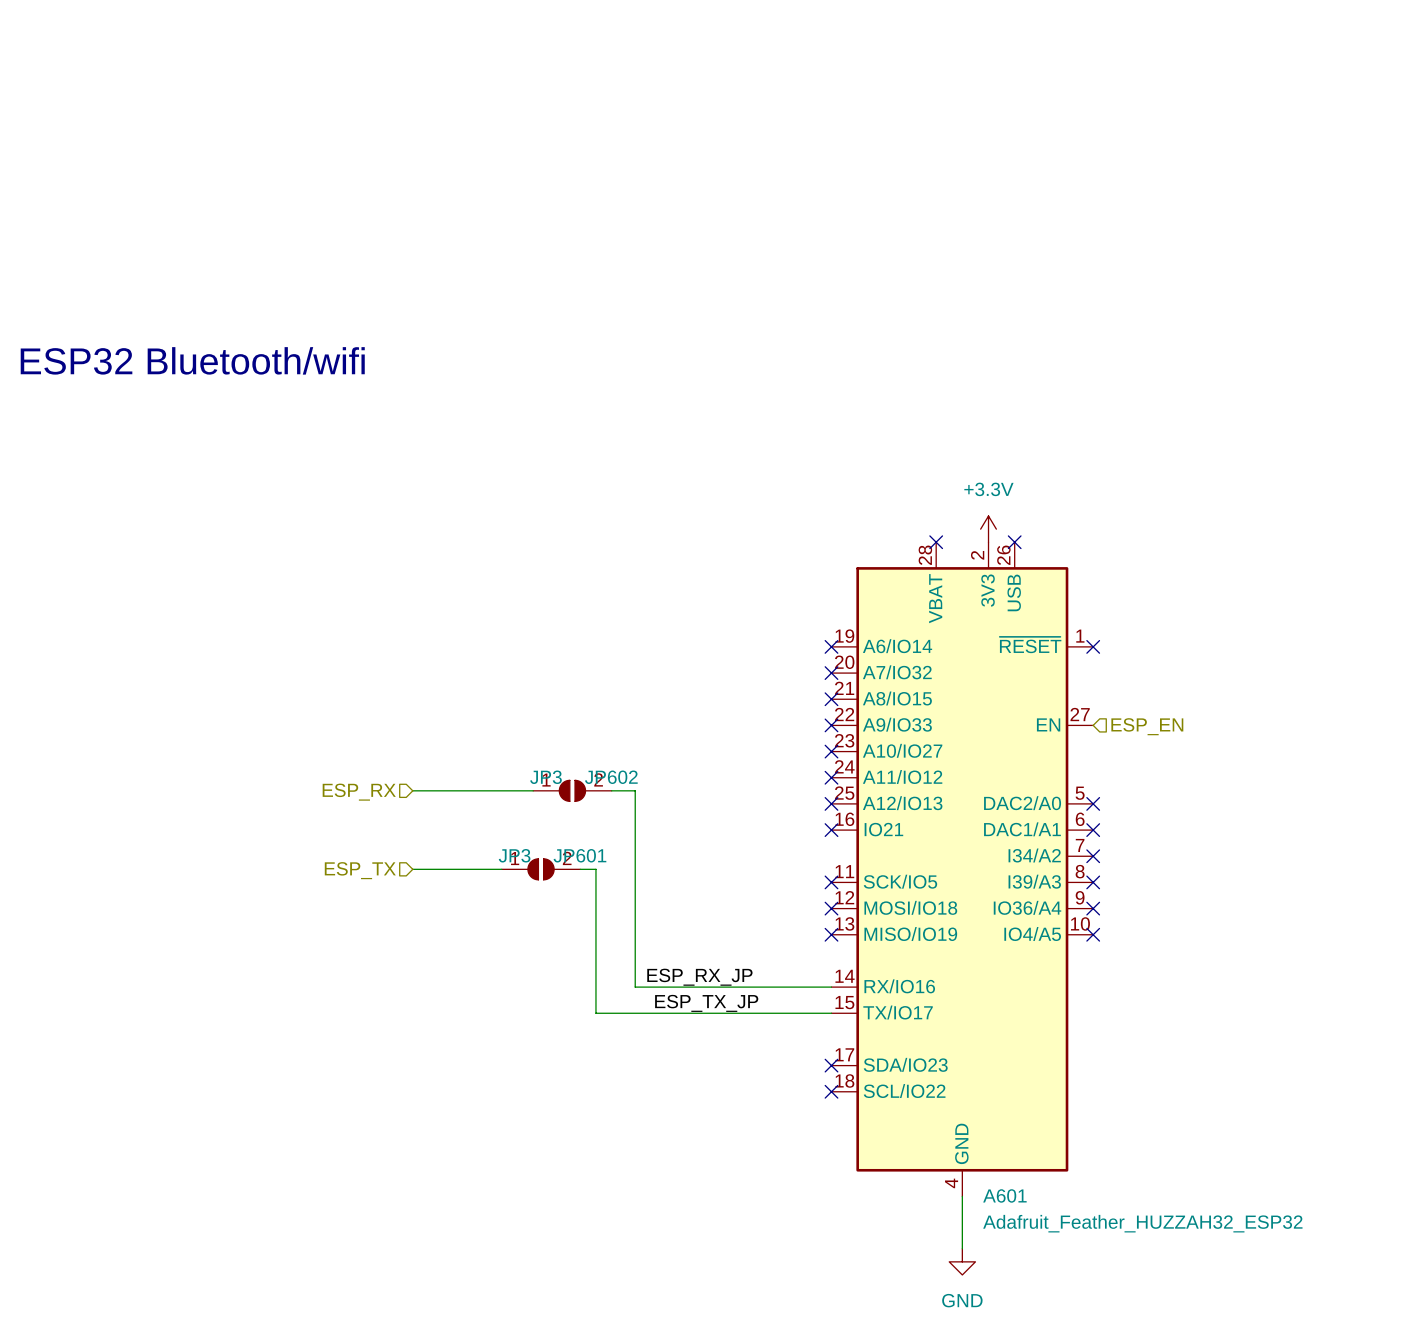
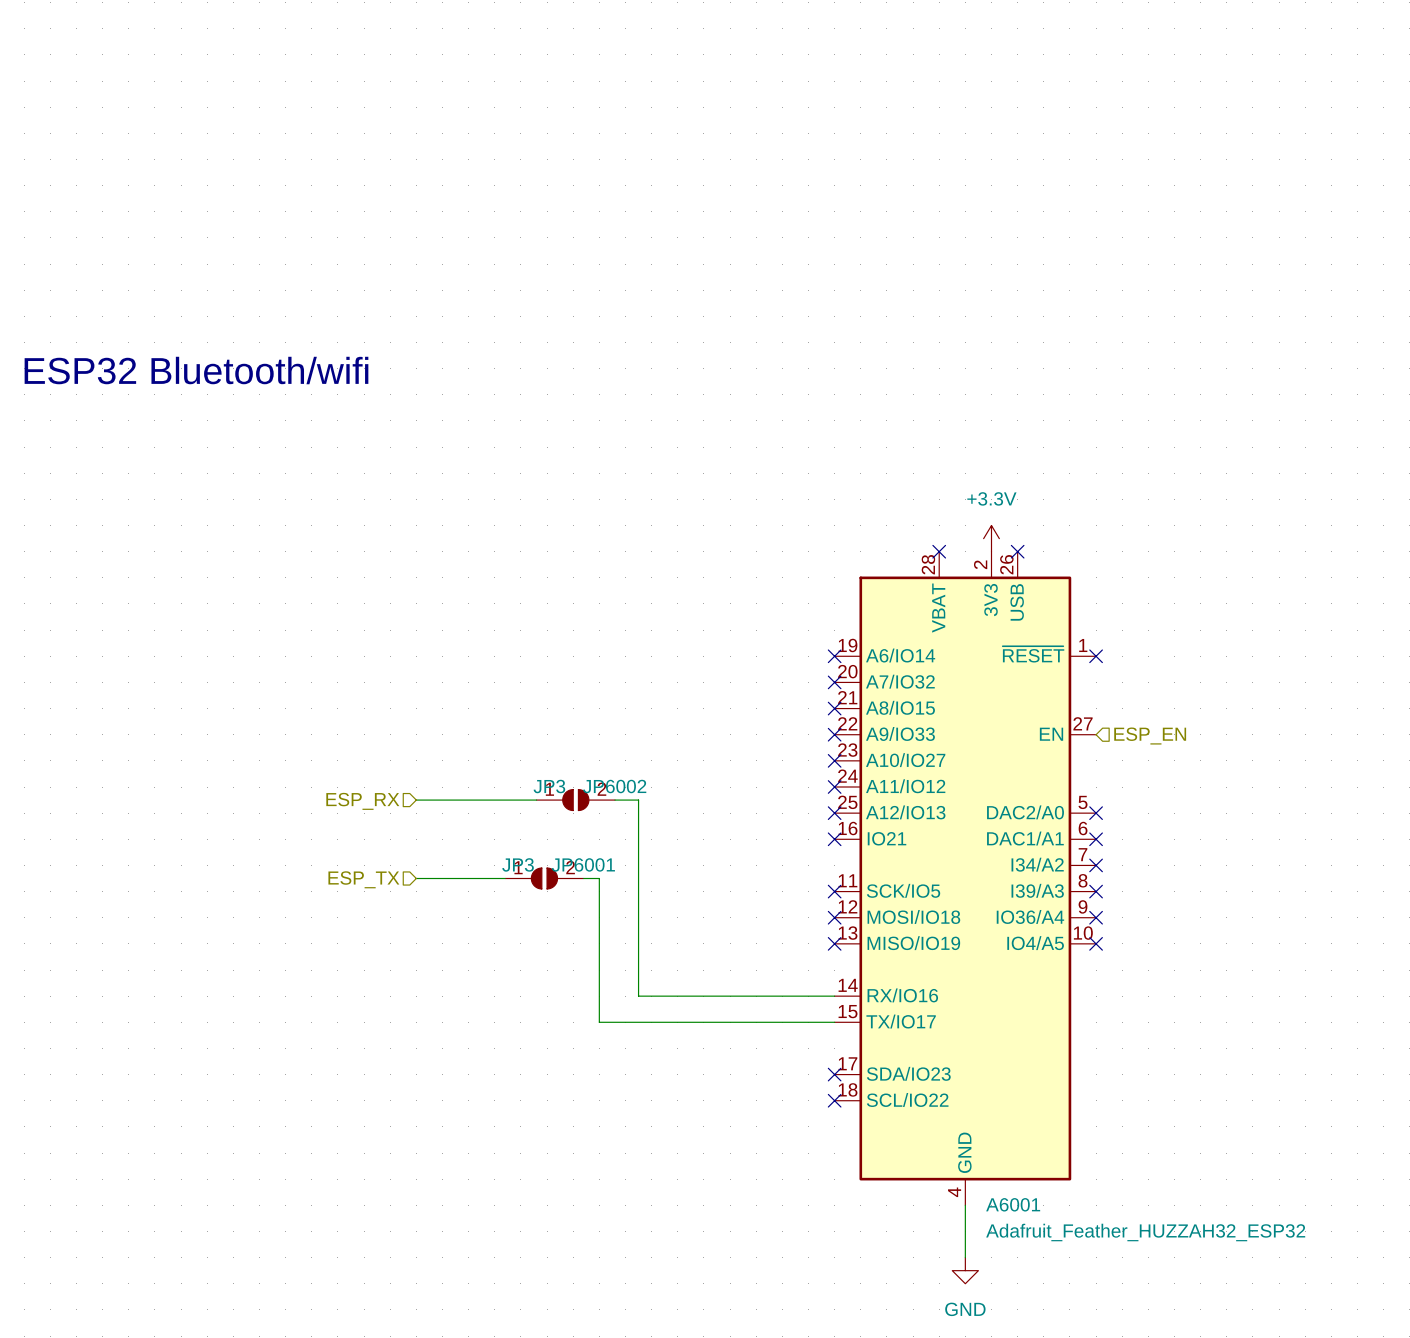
JP602 name: JP602 (611, 777) -> JP6002 (614, 786)
JP601 name: JP601 (579, 855) -> JP6001 (583, 864)
label: ESP_RX_JP (699, 977) -> none
label: ESP_TX_JP (706, 1003) -> none
A601 name: A601 (1004, 1195) -> A6001 (1013, 1204)

